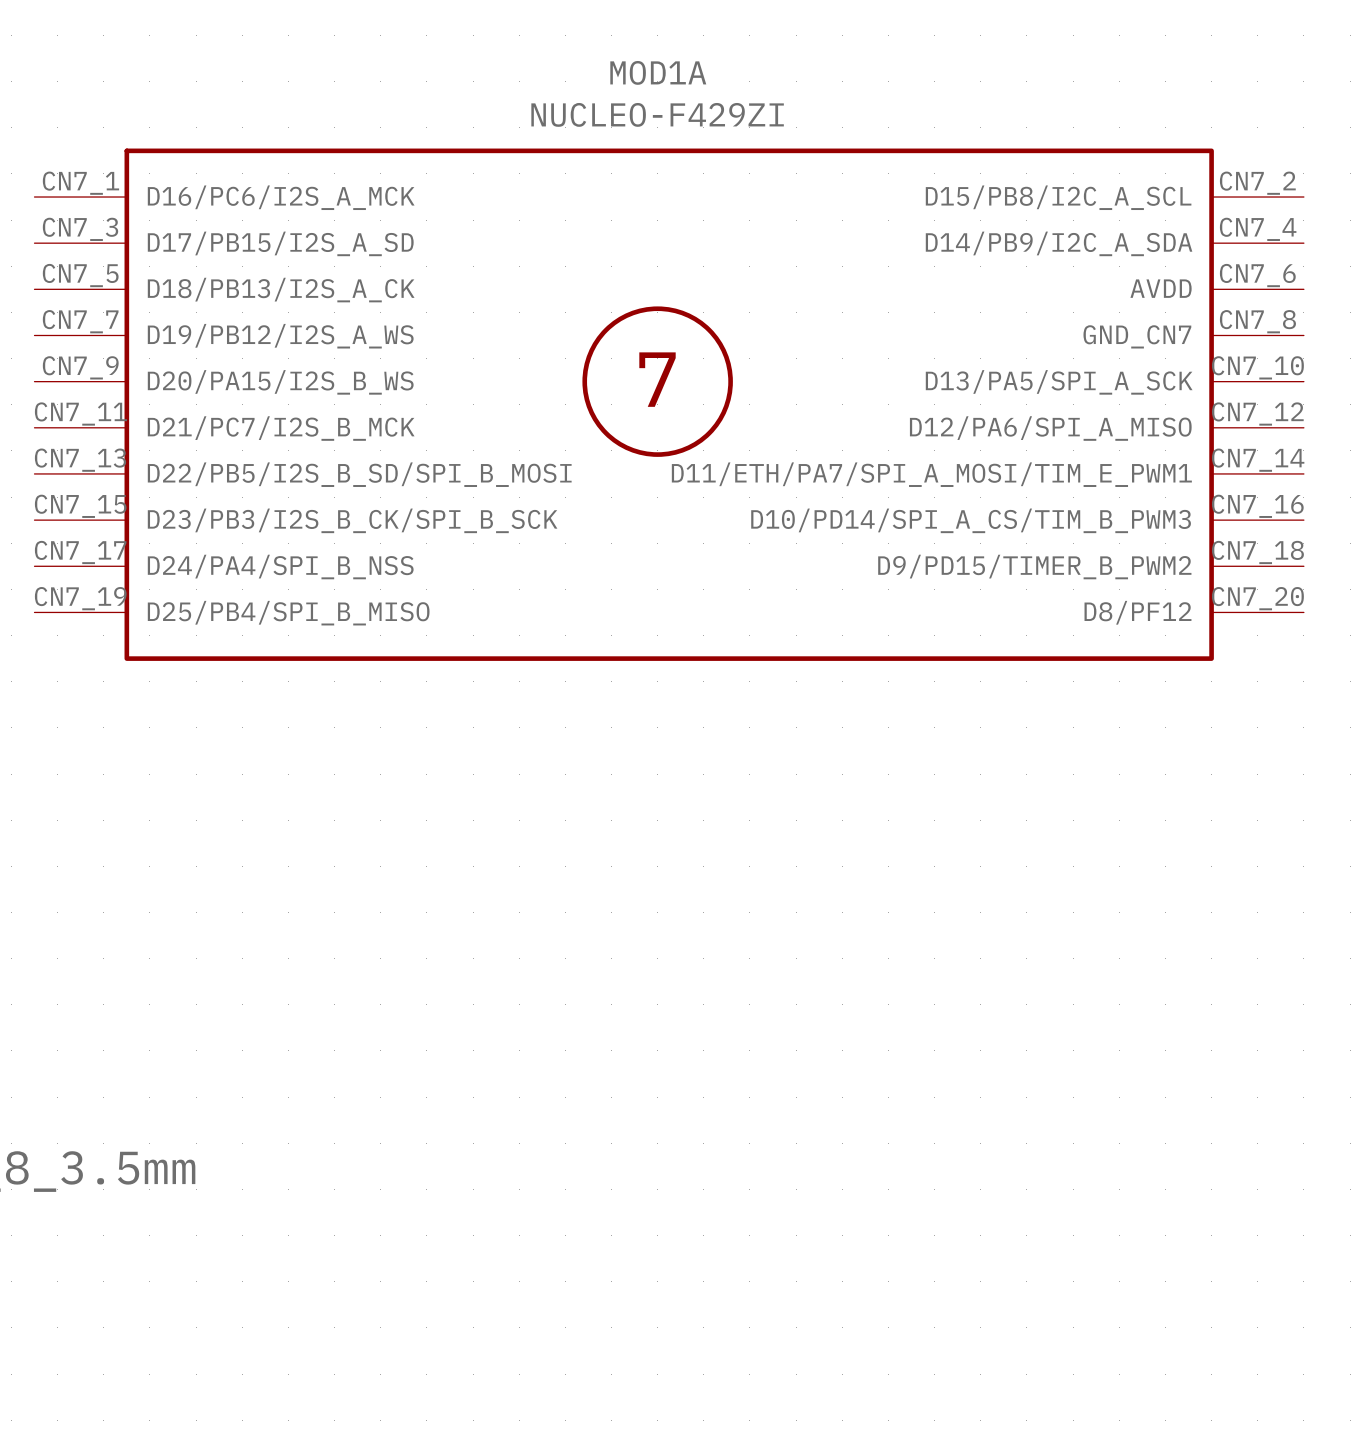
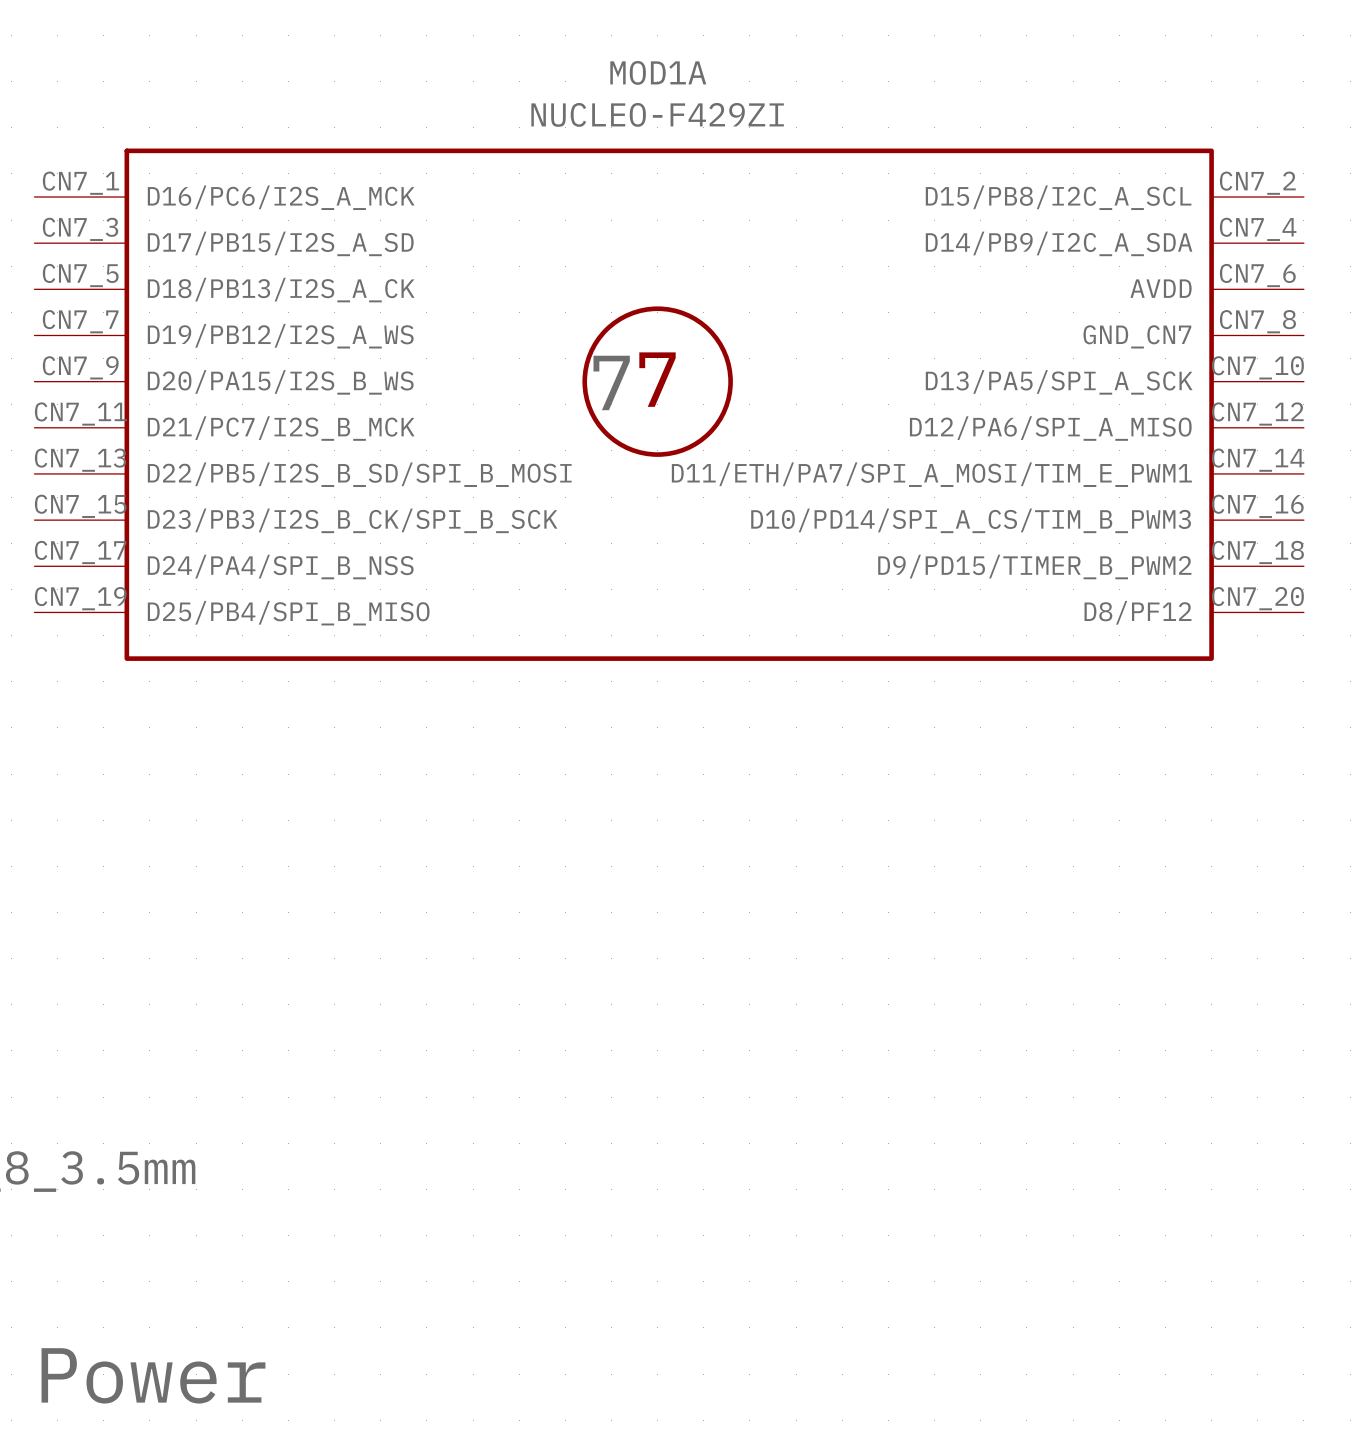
label: none -> 7 (611, 382)
label: none -> Power (153, 1375)

